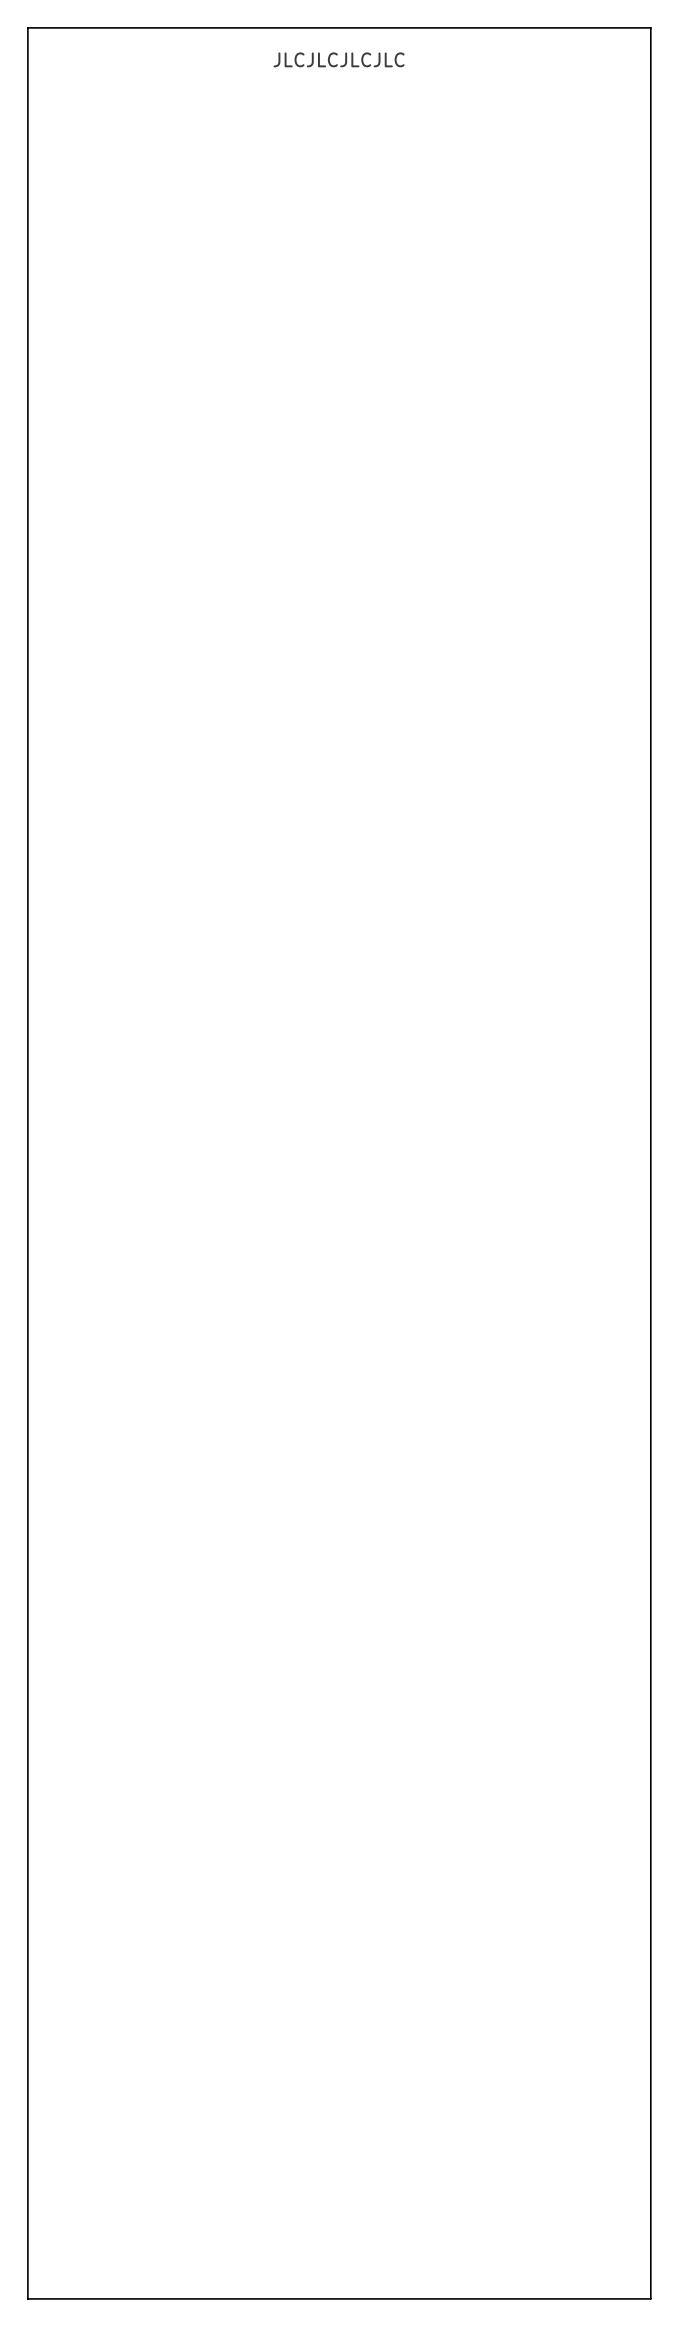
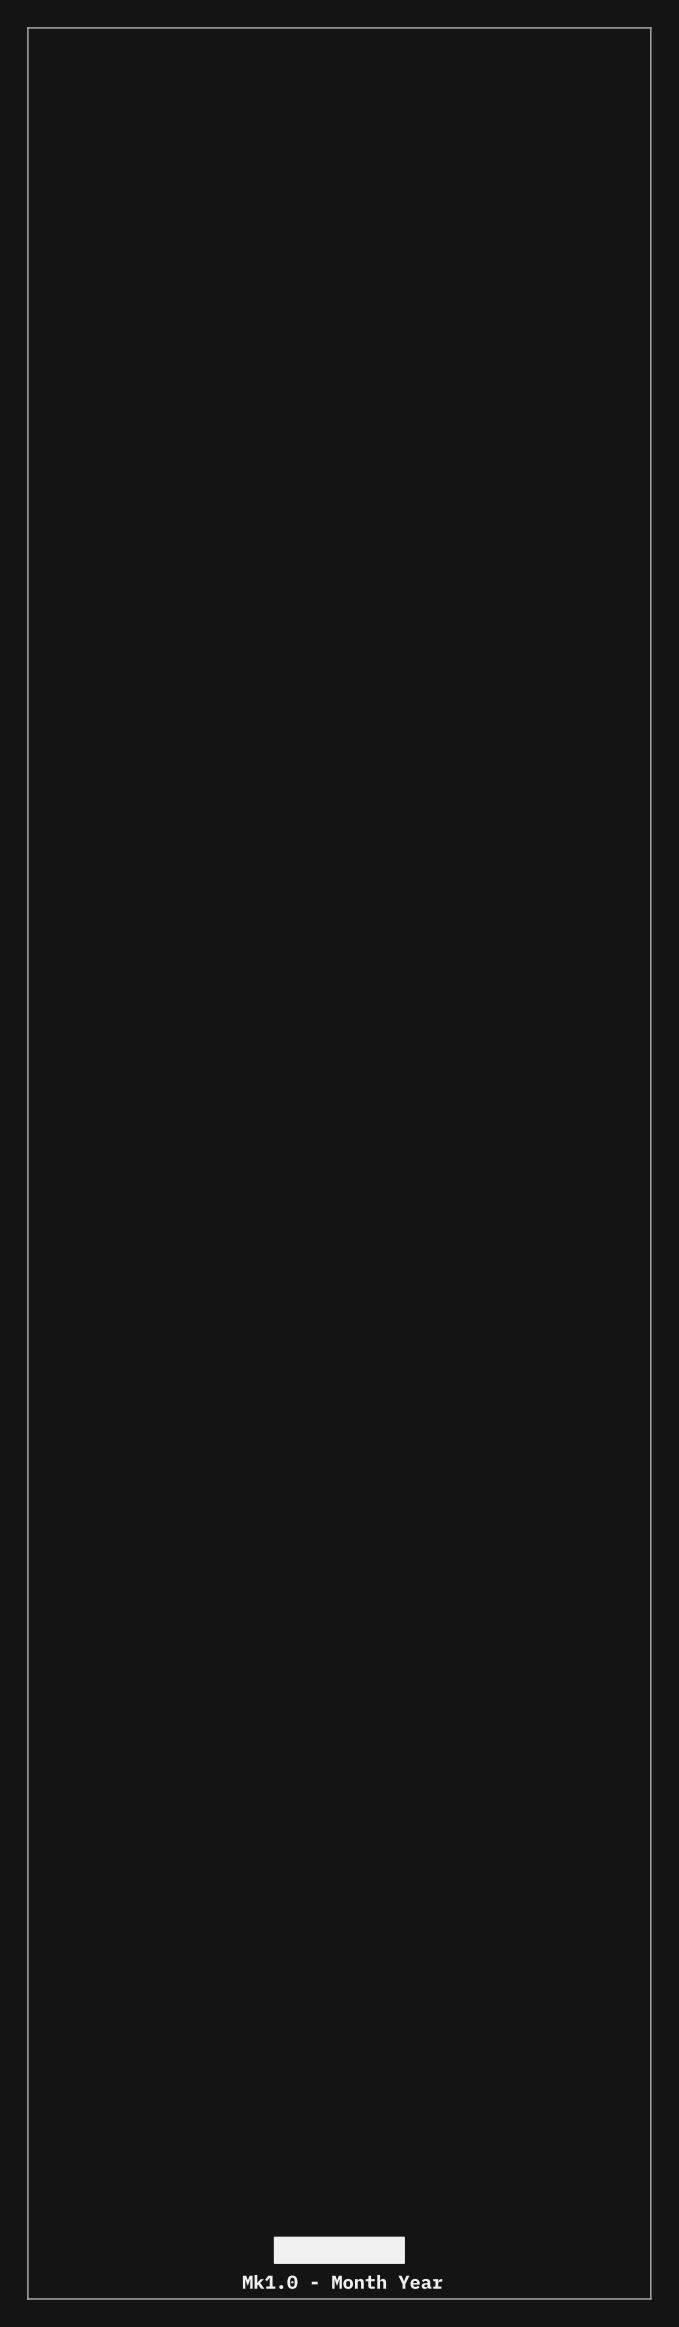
text: JLCJLCJLCJLC (339, 59) -> none
drawing: none -> [273, 2236, 405, 2264]
text: none -> Mk1.0 - Month Year (342, 2281)

